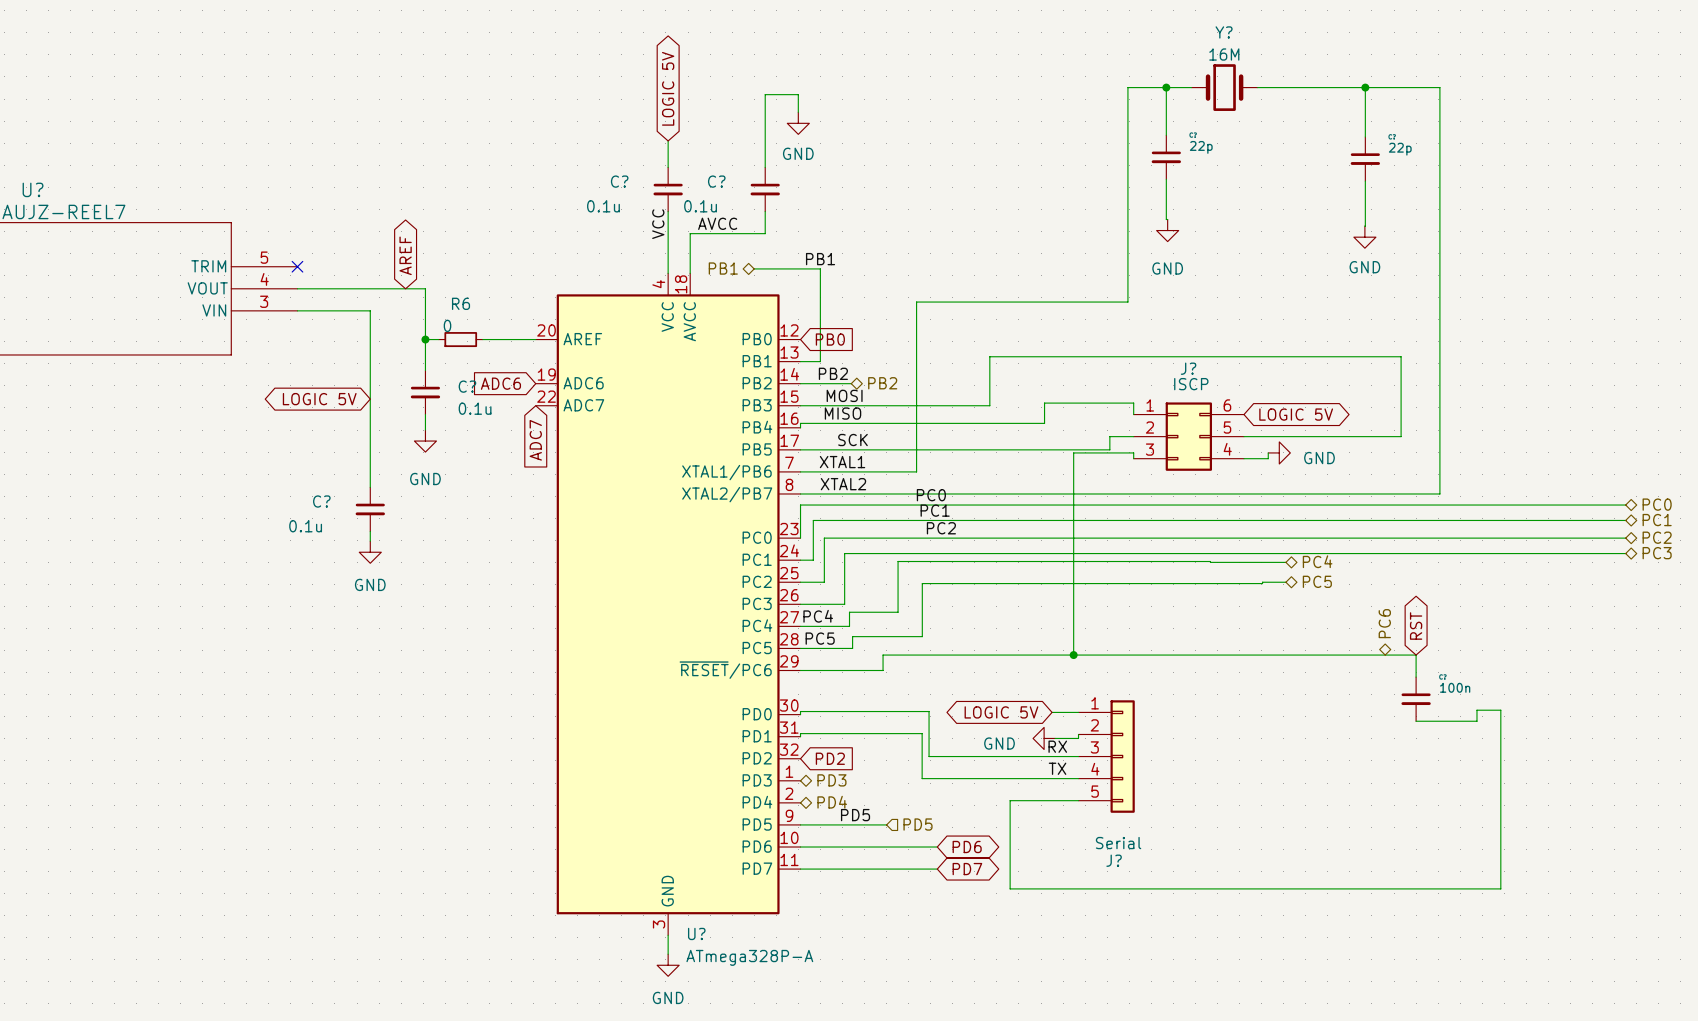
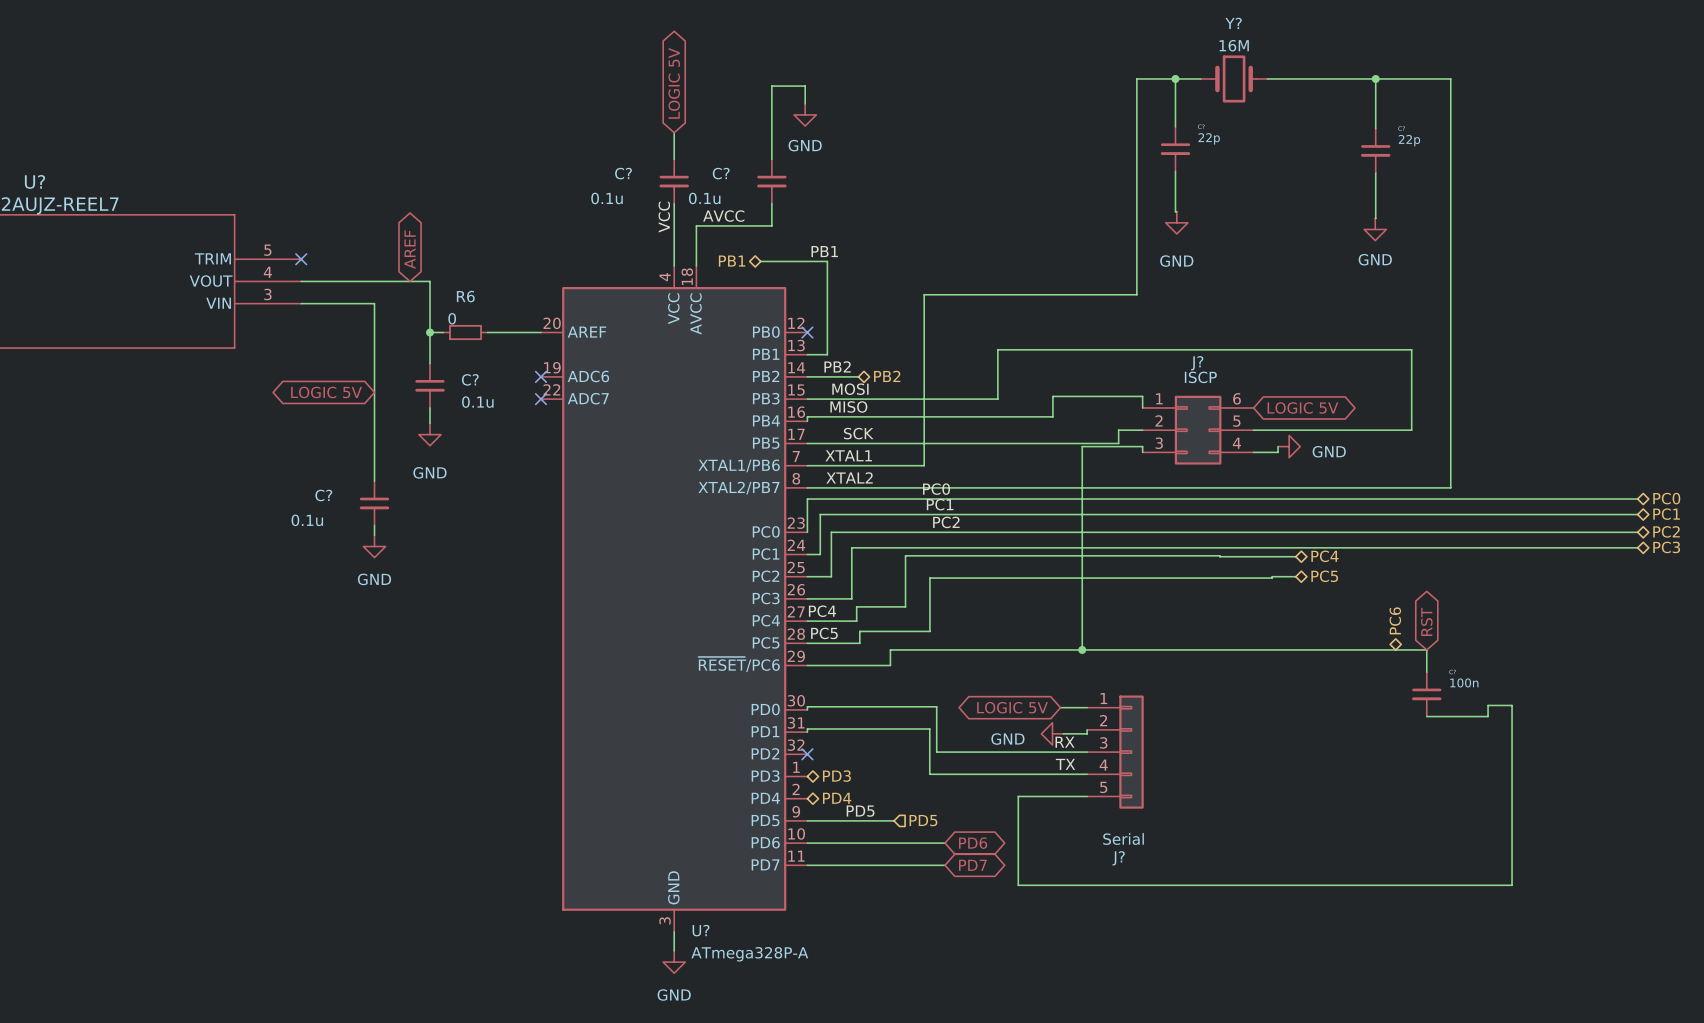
no-connect mark: none -> (807, 332)
global label: PB0 (830, 339) -> none
global label: ADC6 (500, 383) -> none
no-connect mark: none -> (541, 376)
no-connect mark: none -> (541, 399)
global label: ADC7 (535, 440) -> none
no-connect mark: none -> (807, 754)
global label: PD2 (830, 758) -> none

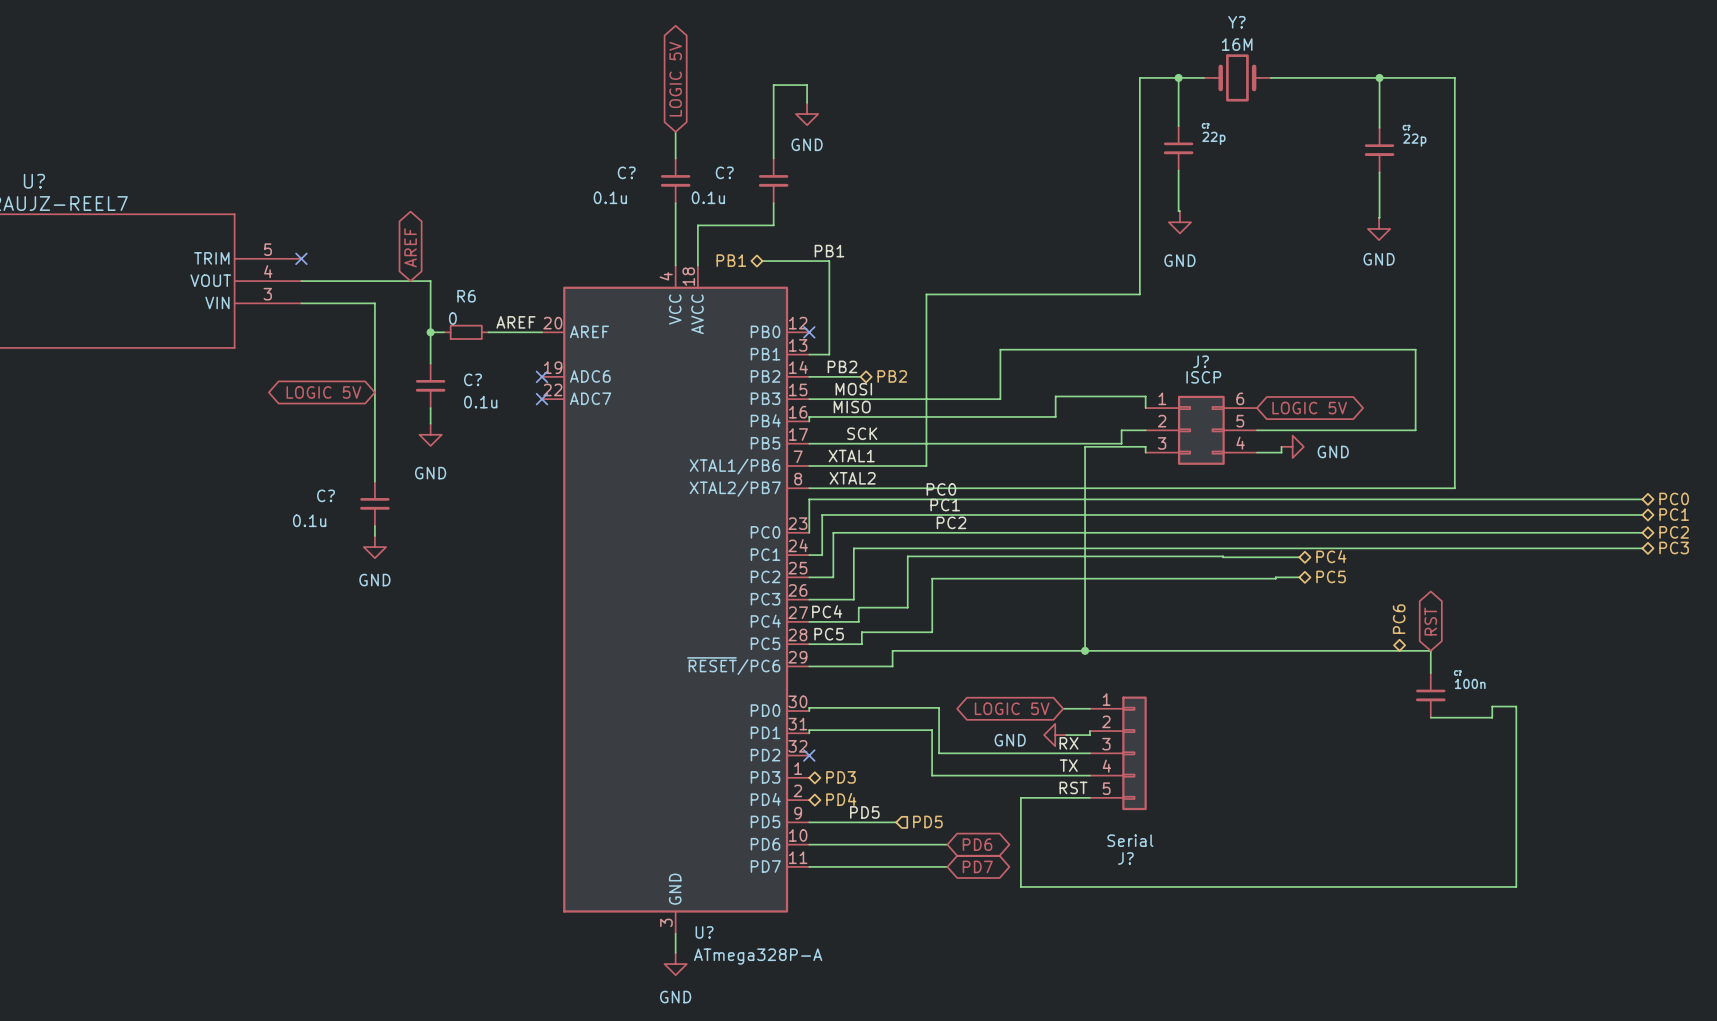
label: AVCC (723, 216) -> none
label: VCC (664, 217) -> none
label: none -> AREF (515, 322)
label: none -> RST (1073, 787)

